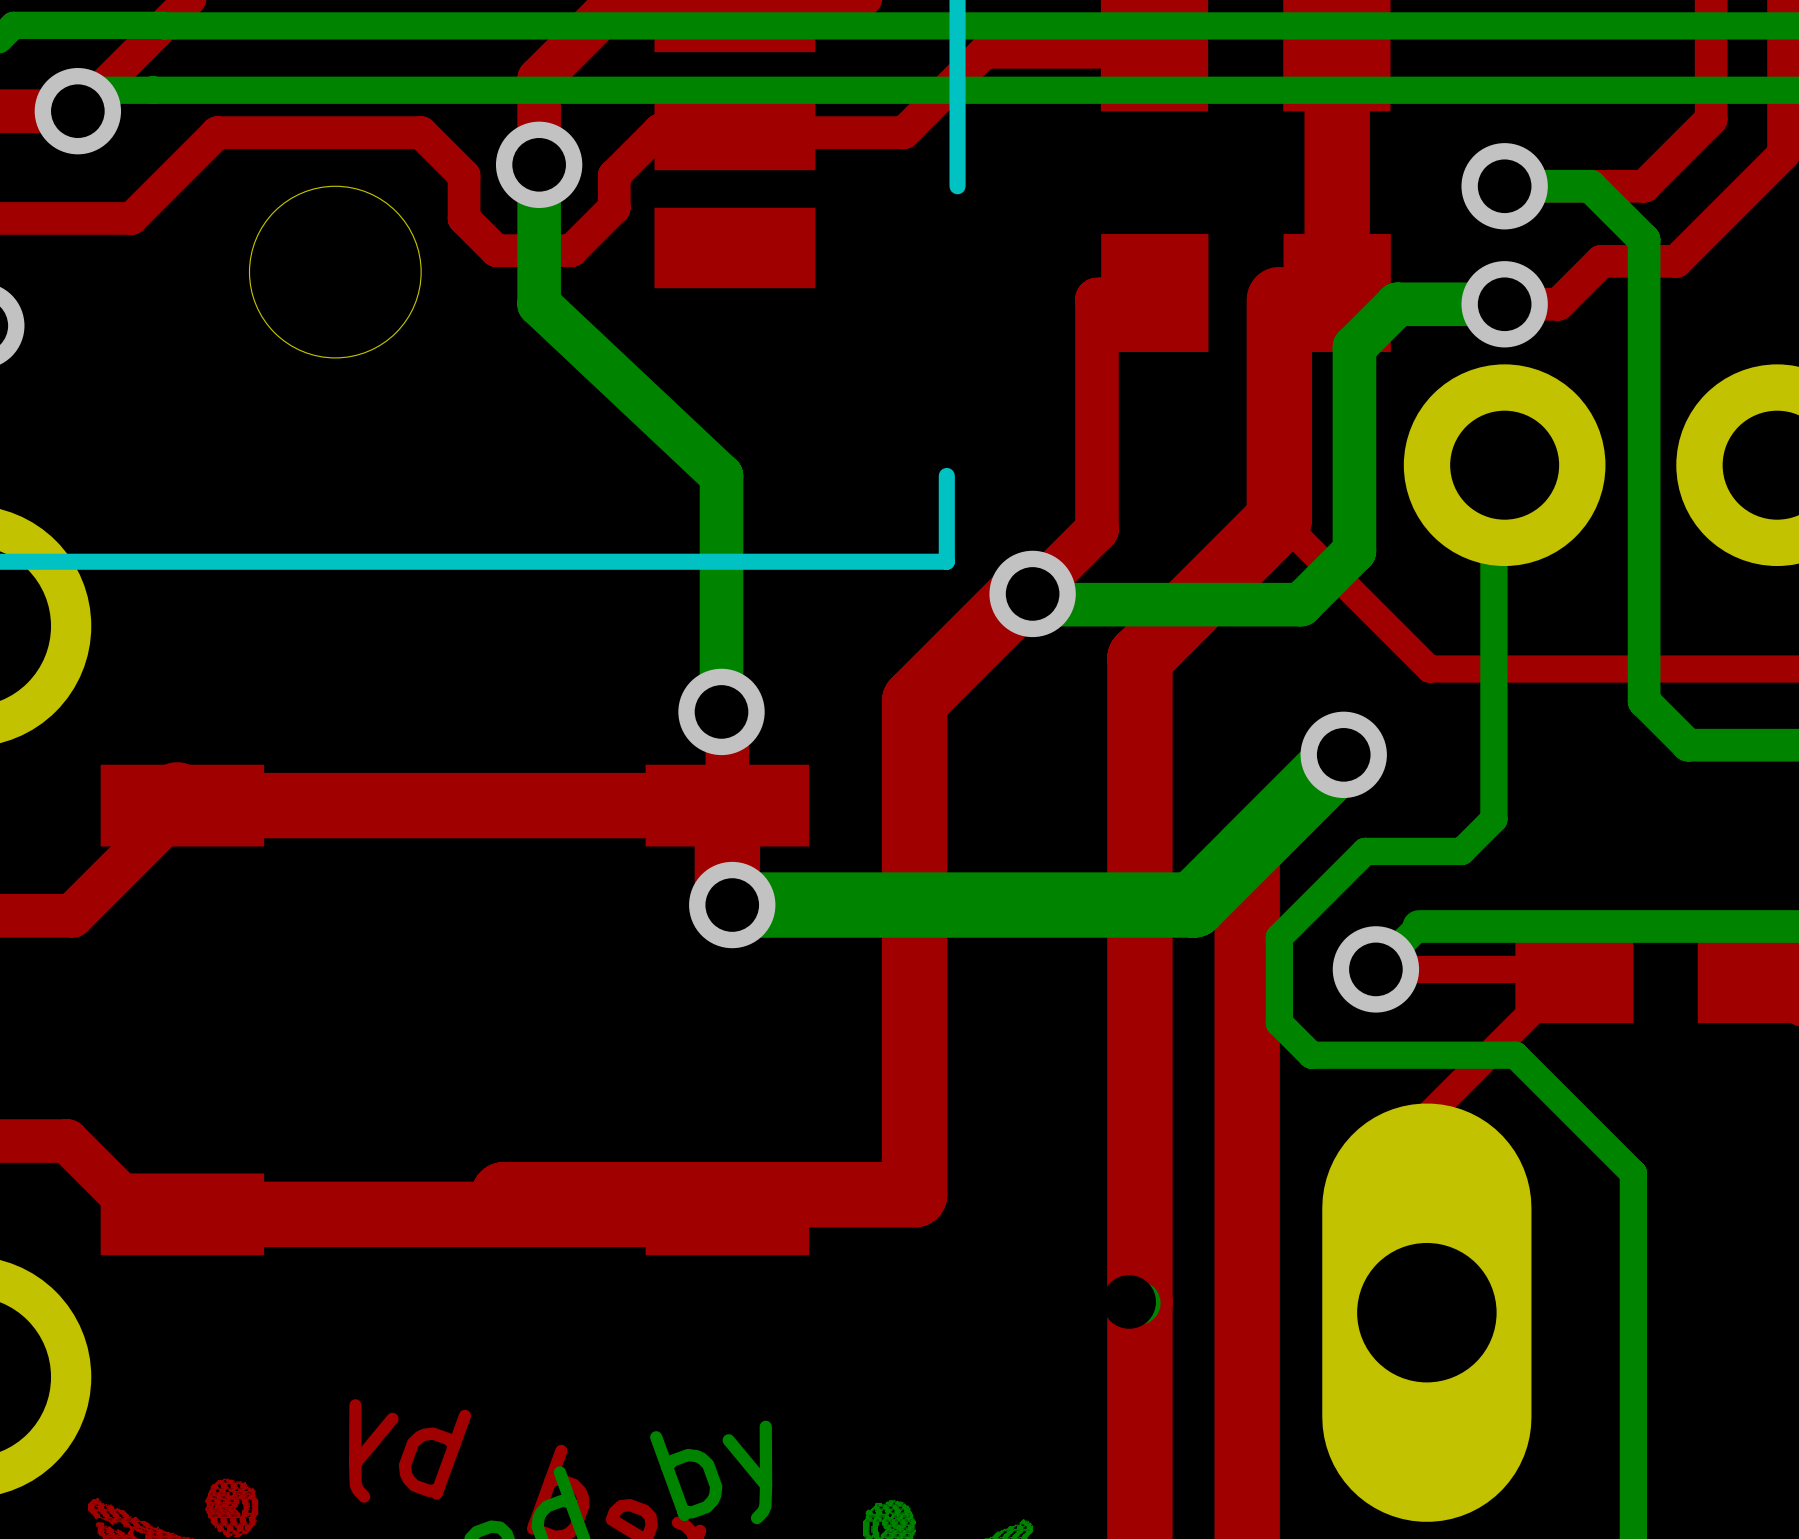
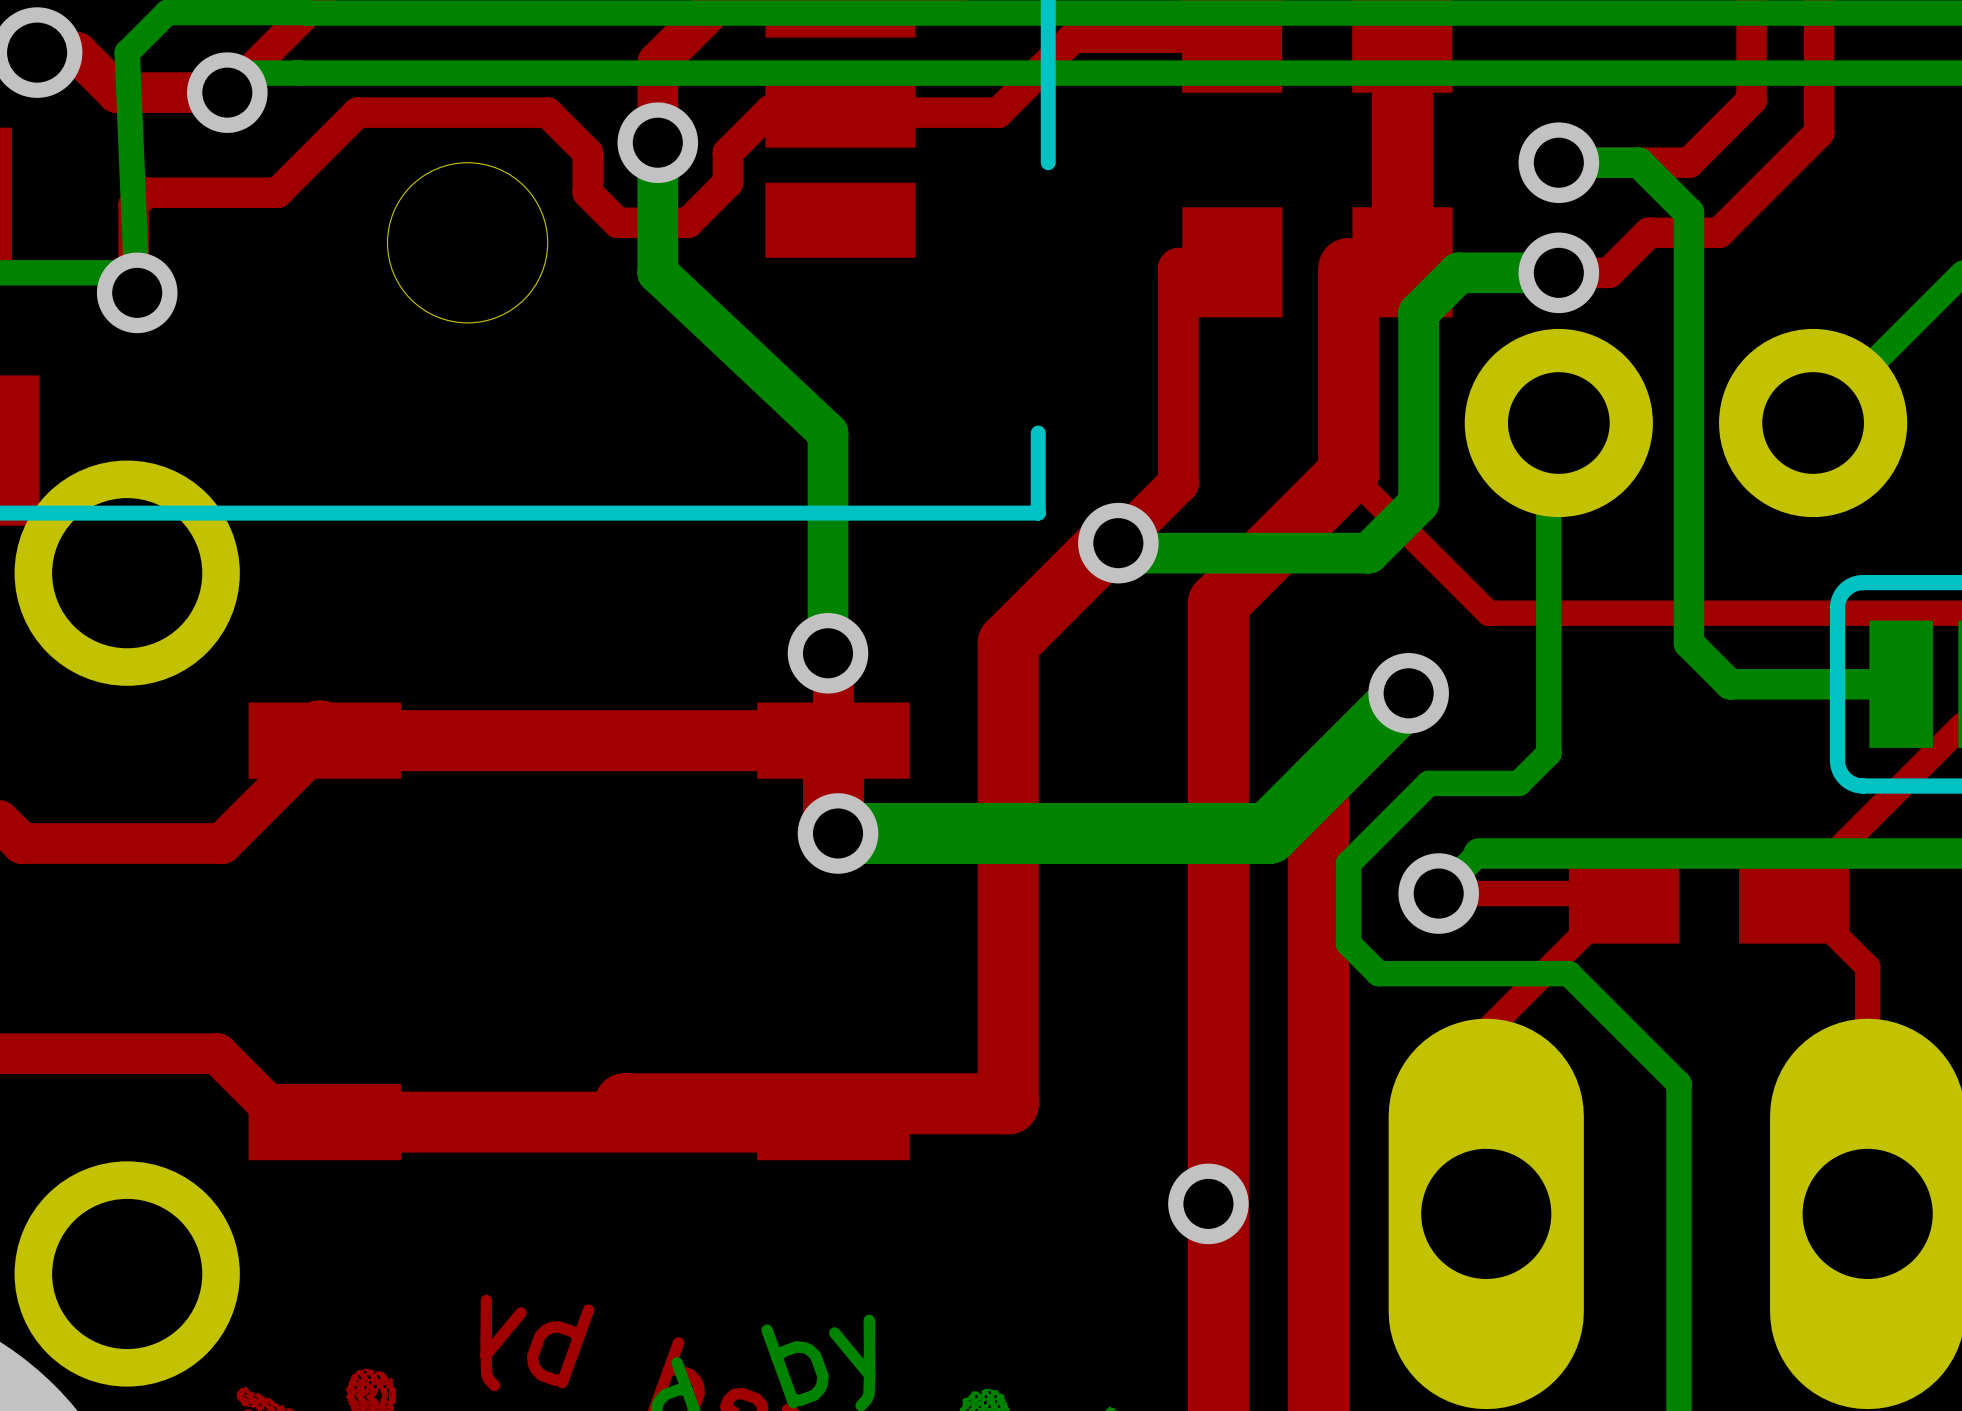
via size: [1102, 1275, 1156, 1329] -> [1168, 1163, 1249, 1245]

